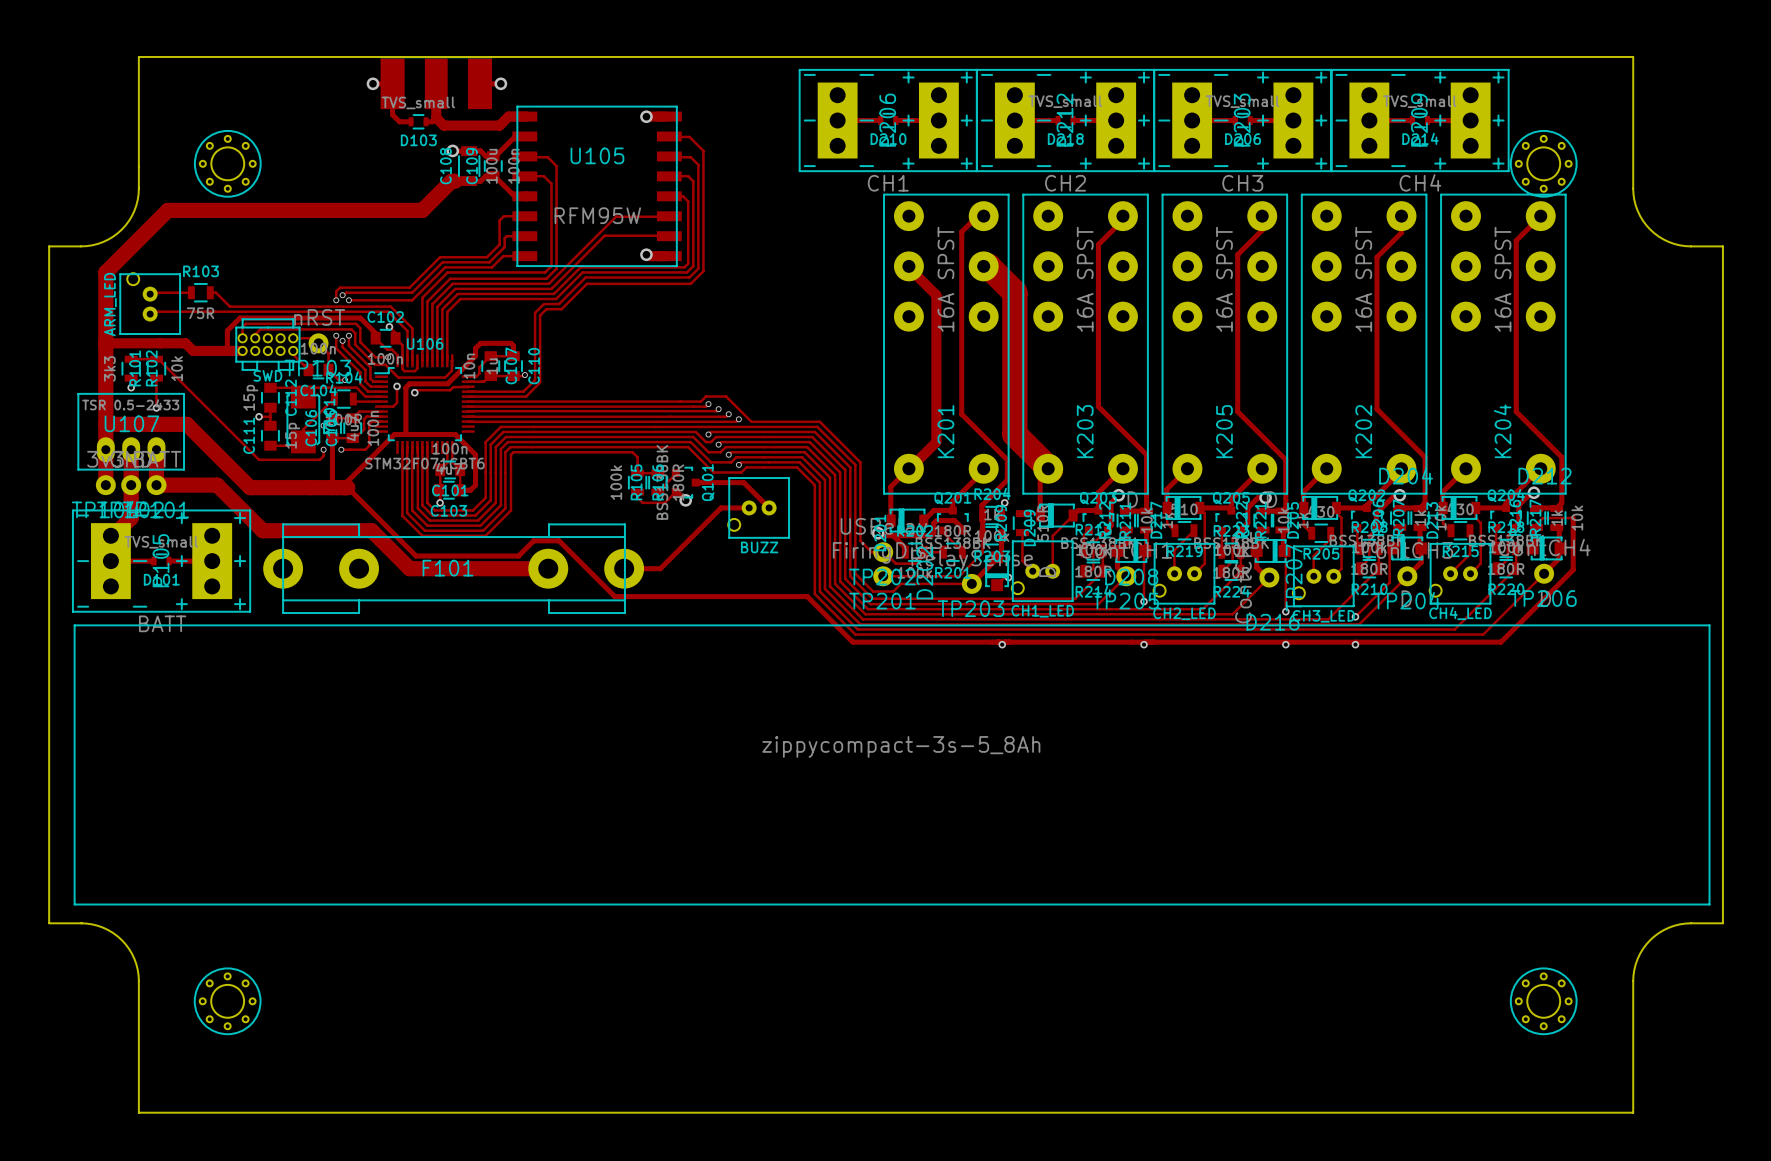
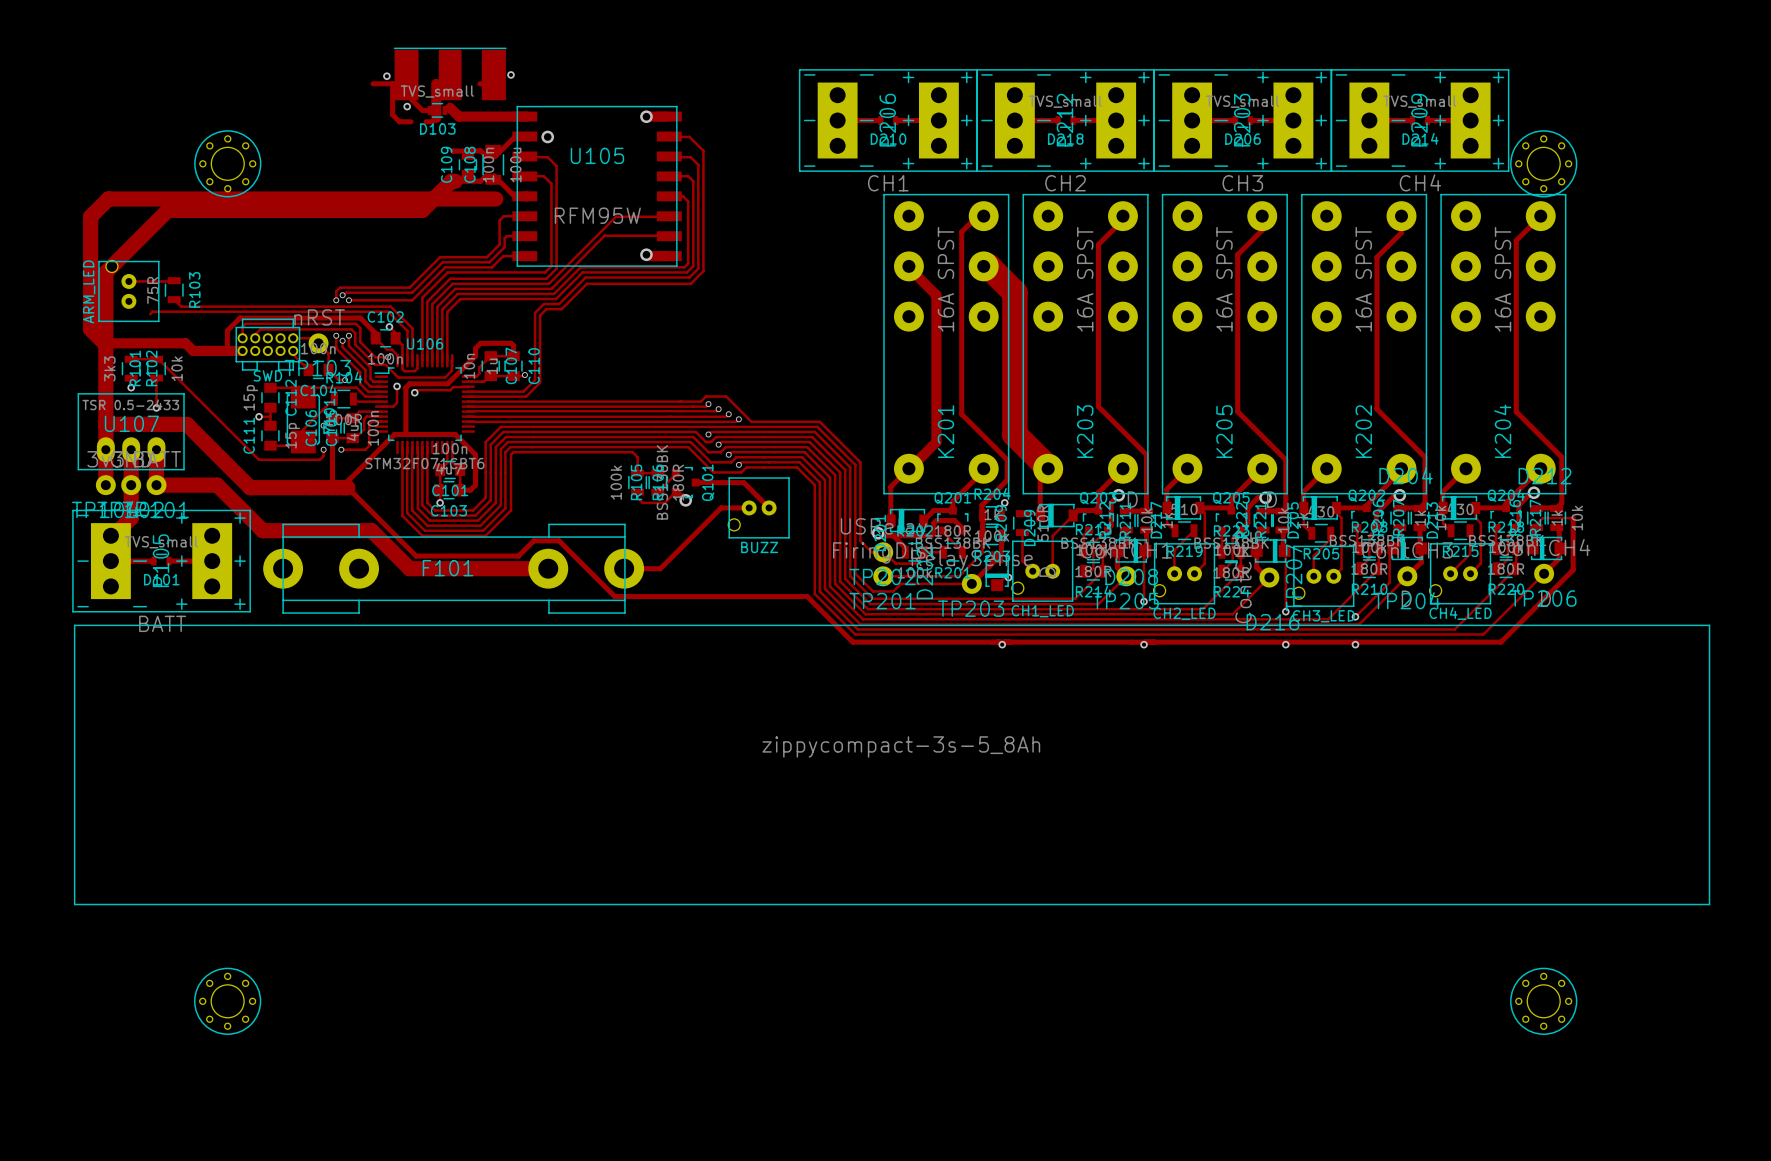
via: none -> (510, 74)
via: none -> (386, 76)
part position: (436, 82) -> (450, 73)
via: (372, 83) -> none
via: (500, 83) -> none
track: none -> (407, 95) (422, 110) (430, 110)
via: none -> (407, 106)
track: (508, 116) (499, 125) (443, 125) (436, 117) -> (508, 116) (458, 116) (450, 107)
D103 position: (418, 121) -> (437, 110)
via: none -> (547, 136)
via: (452, 150) -> none
C108 position: (469, 166) -> (493, 164)
C109 position: (493, 166) -> (467, 164)
track: none -> (495, 199) (108, 199) (90, 216) (90, 329) (105, 344)
track: none -> (174, 280) (128, 281)
track: (191, 292) (150, 293) -> none
R103 rotation: 0° (200, 292) -> 90° clockwise (174, 290)
R103 position: (200, 292) -> (174, 290)
track: (209, 292) (216, 292) (229, 306) -> (174, 300) (181, 306) (229, 306)
part position: (150, 303) -> (128, 291)
board edge: (81, 923) (86, 923) (97, 925) (117, 936) (129, 948) (136, 964) (138, 981) (138, 1112) (1633, 1112) (1633, 981) (1635, 964) (1640, 953) (1650, 940) (1668, 927) (1685, 923) (1722, 923) (1722, 246) (1685, 246) (1668, 242) (1650, 229) (1640, 215) (1634, 199) (1633, 188) (1633, 56) (138, 56) (138, 188) (137, 199) (132, 215) (121, 229) (103, 242) (86, 246) (49, 246) (49, 923) (82, 923) -> none

